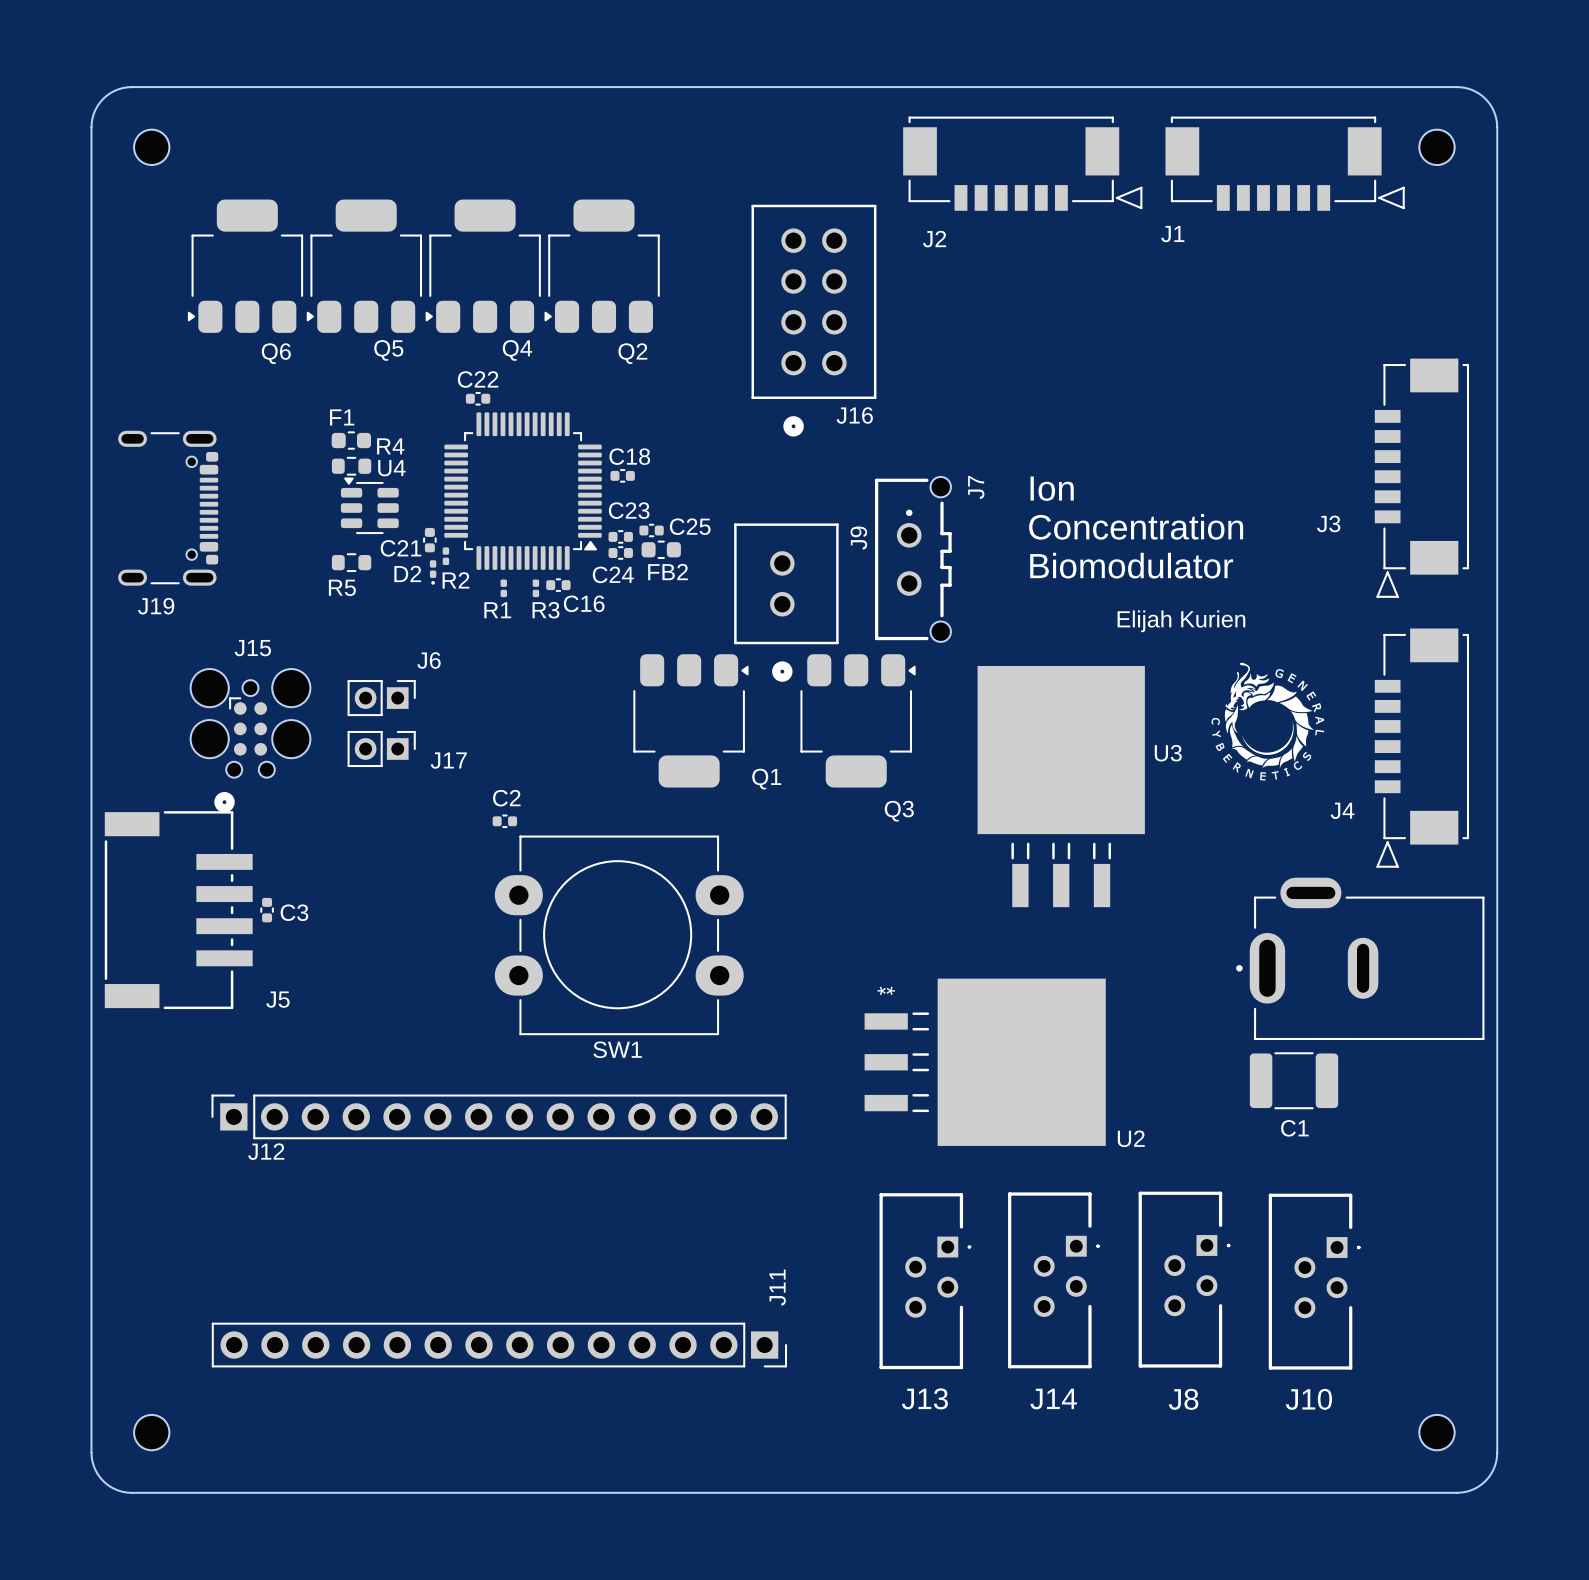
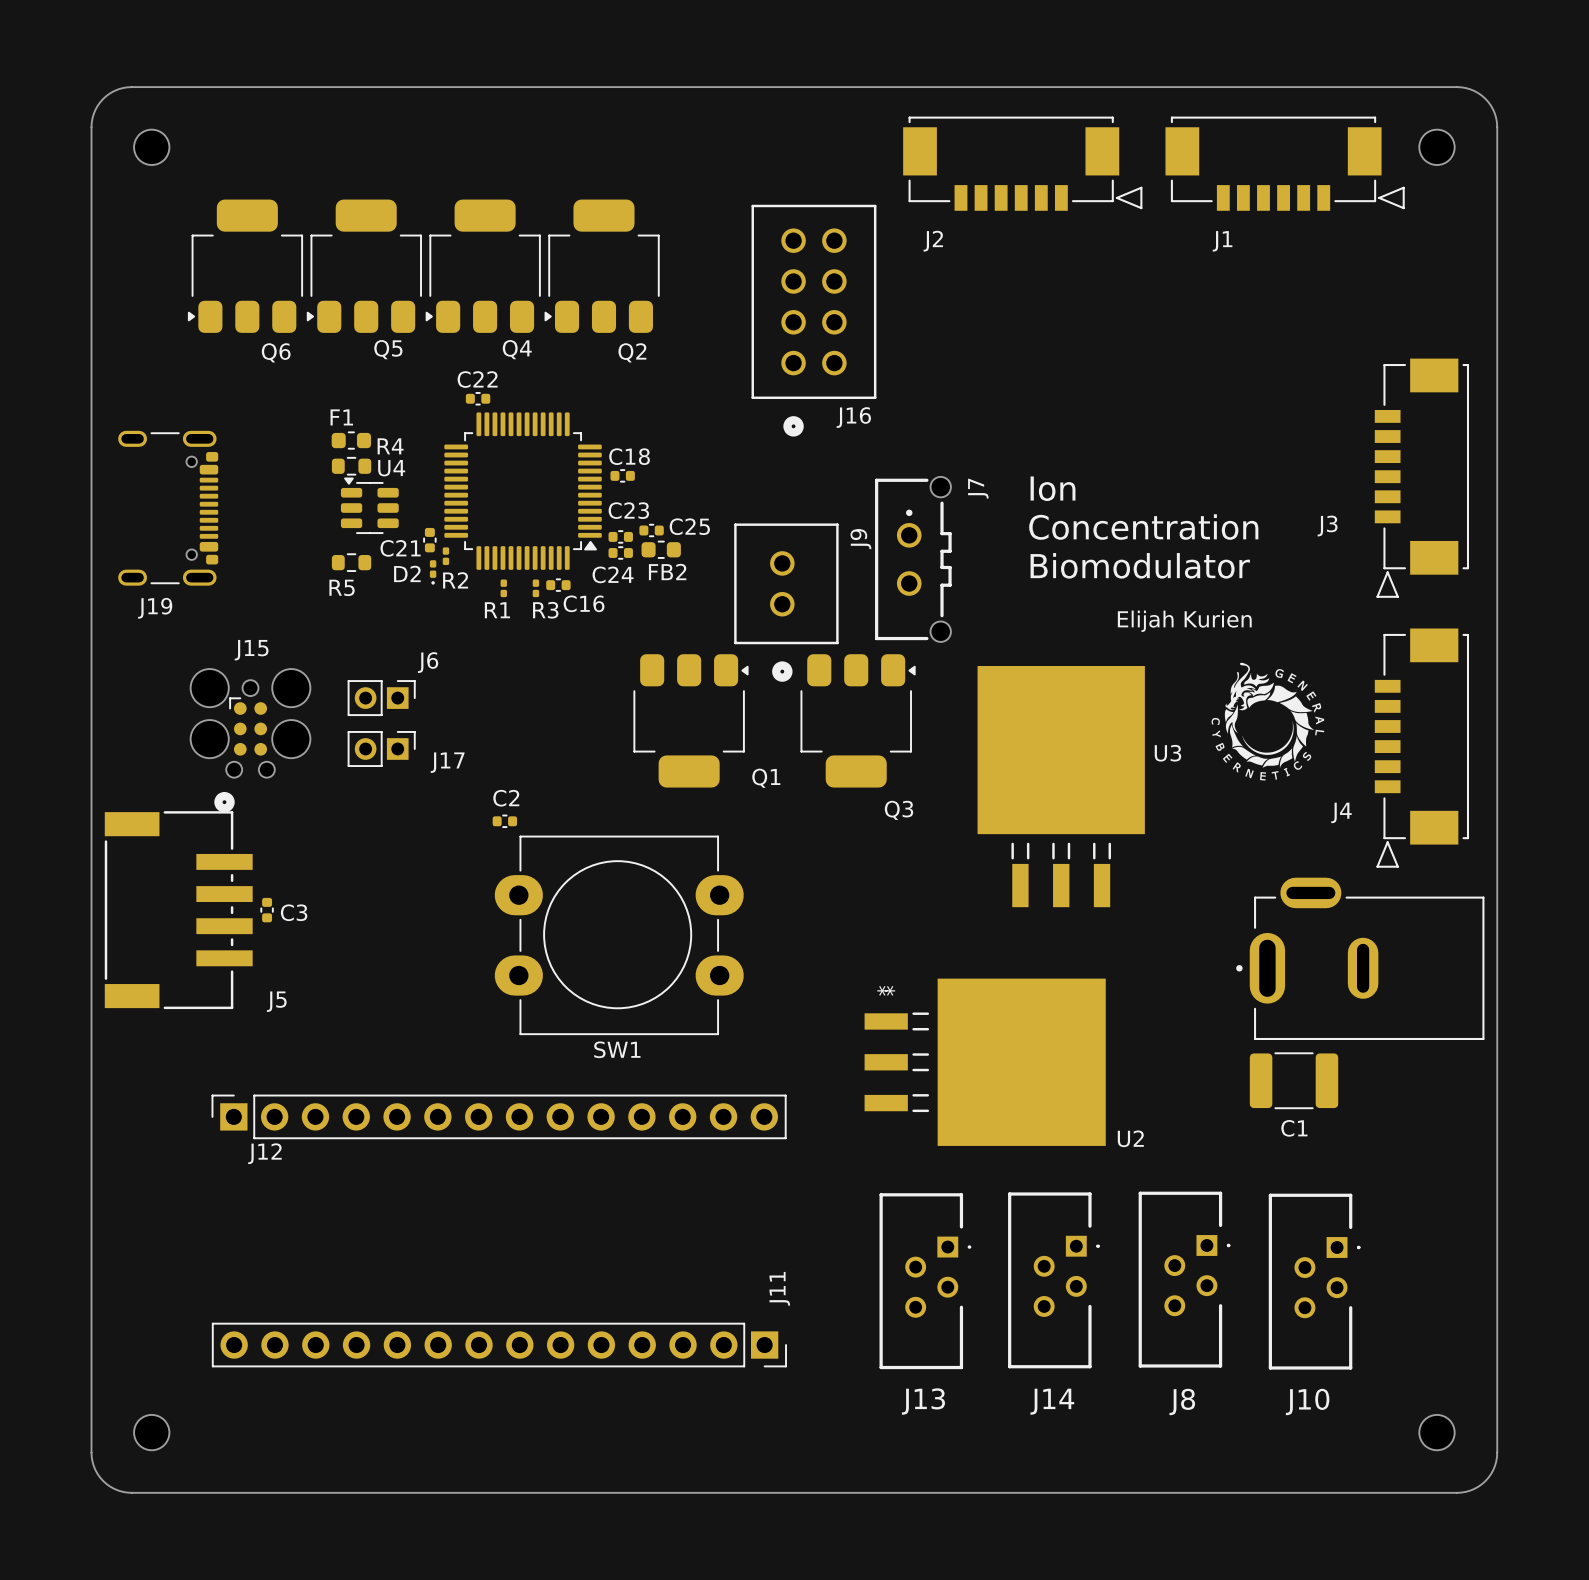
J1 name position: J1 (1172, 234) -> J1 (1222, 241)

